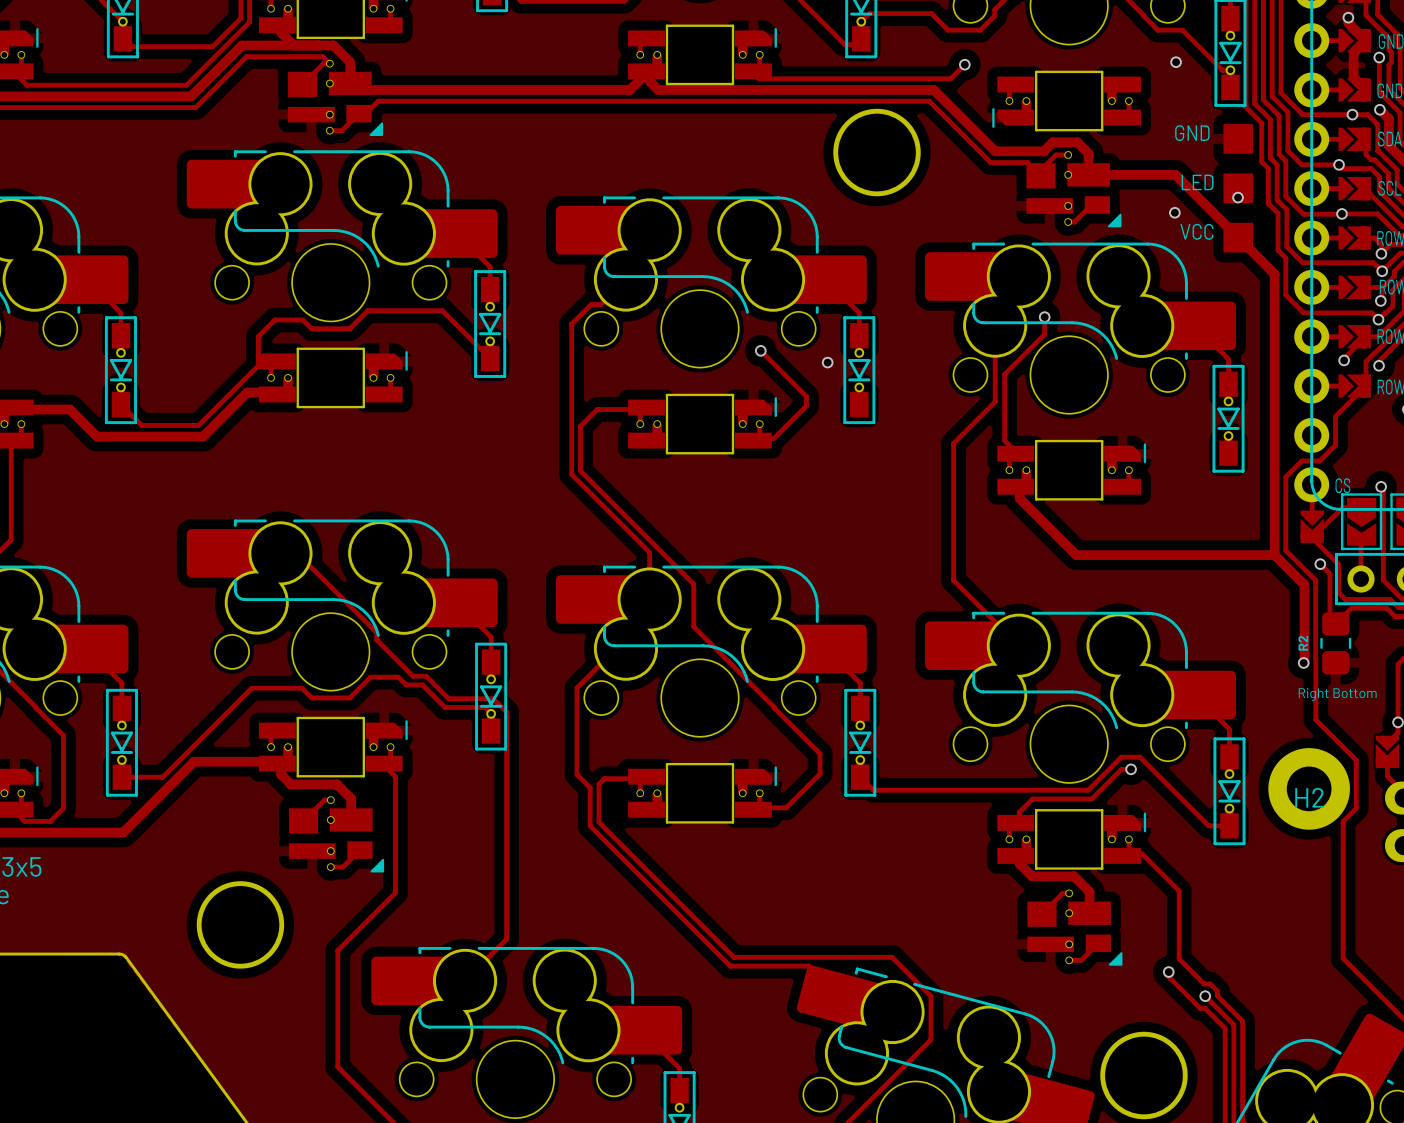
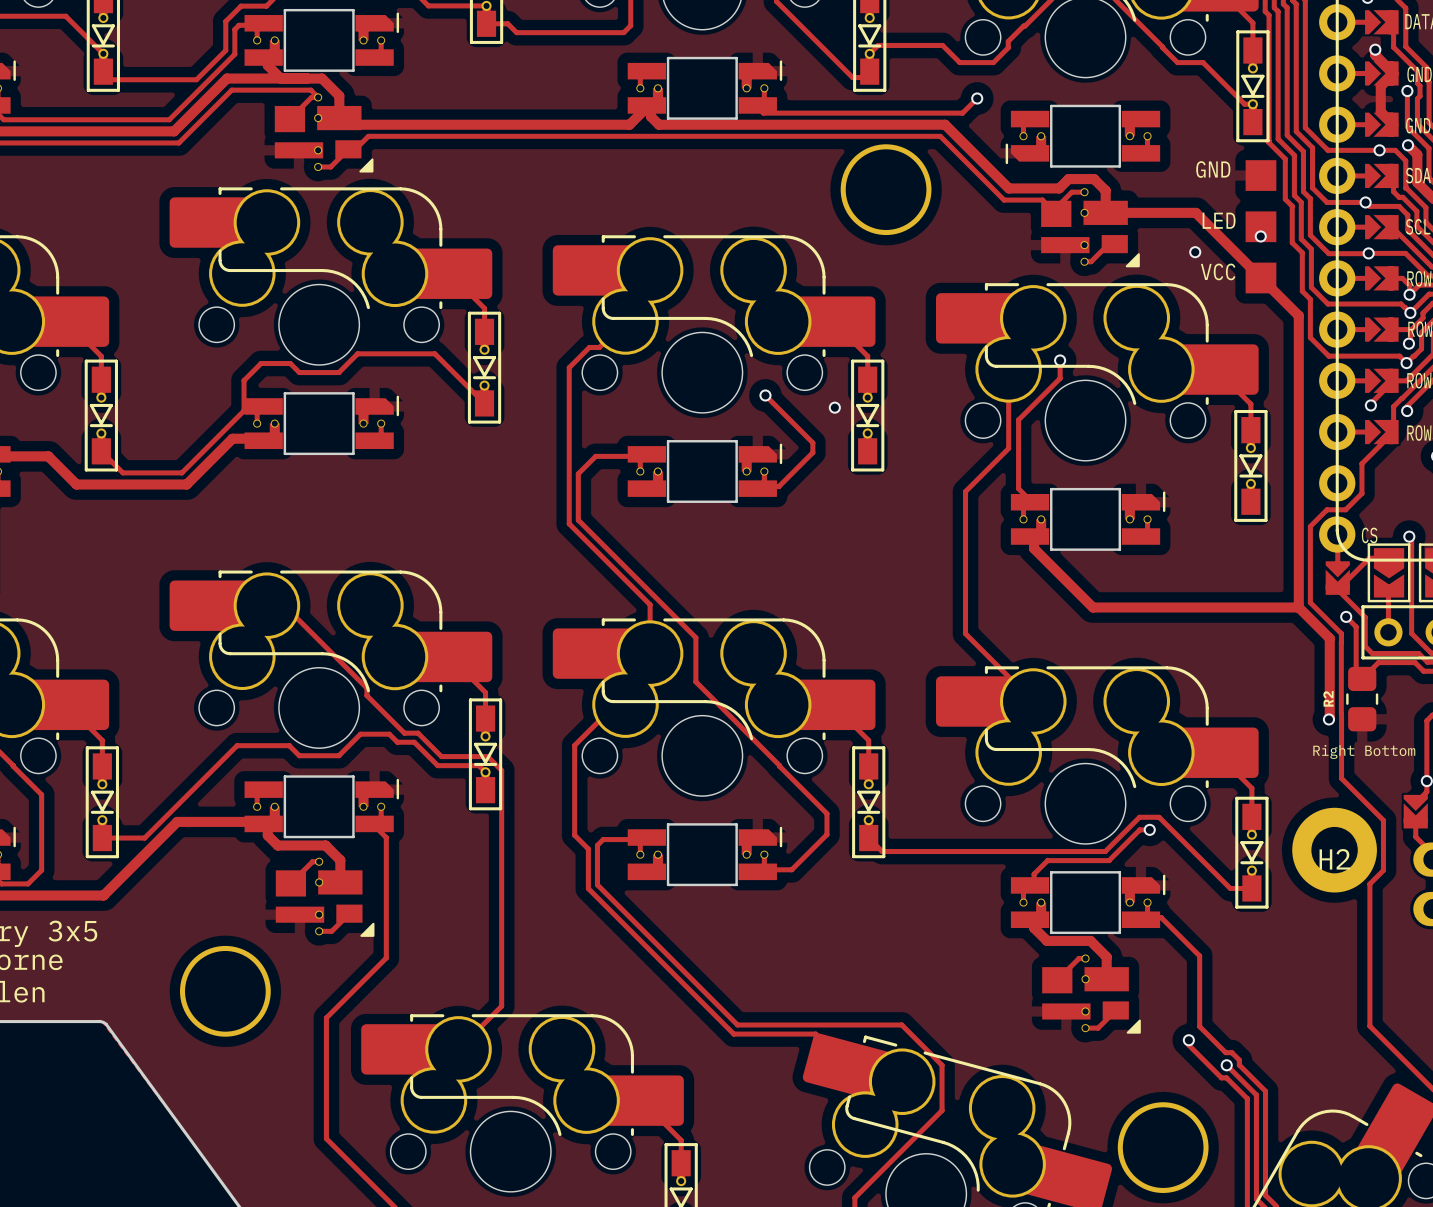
via: (1176, 62) -> none

